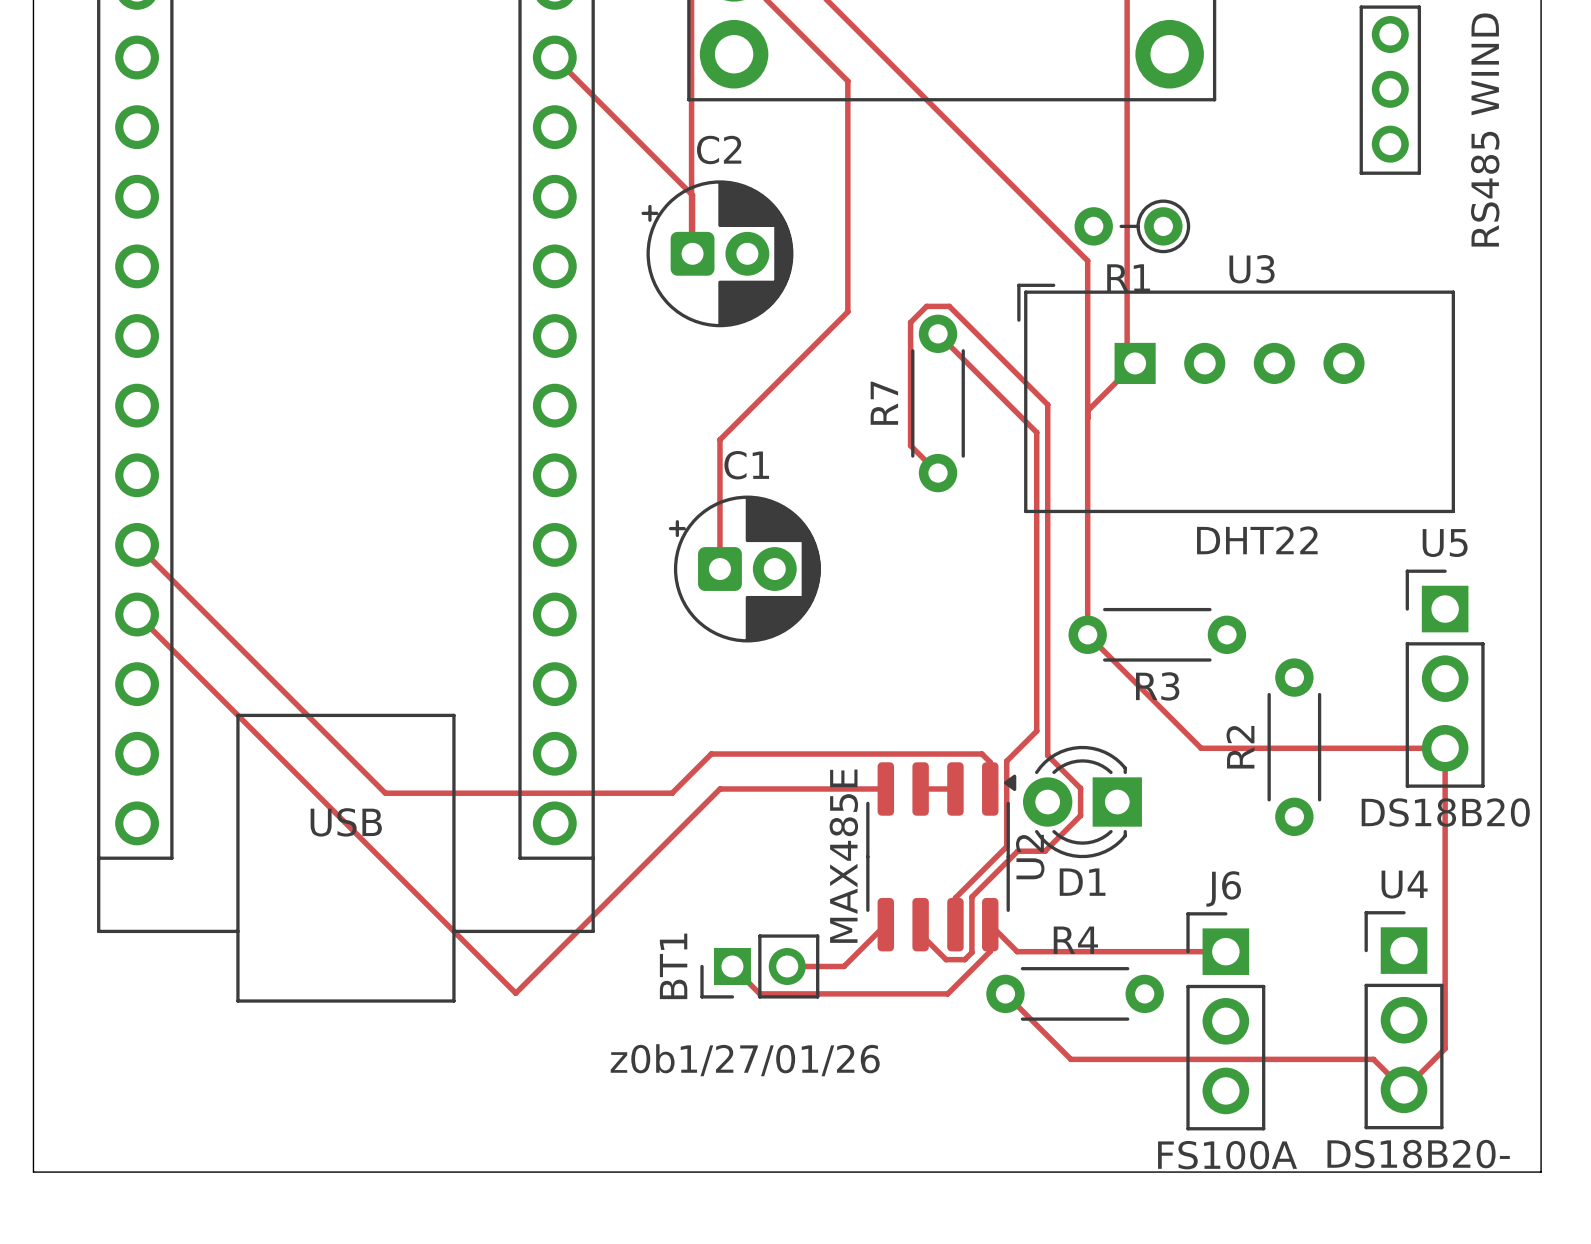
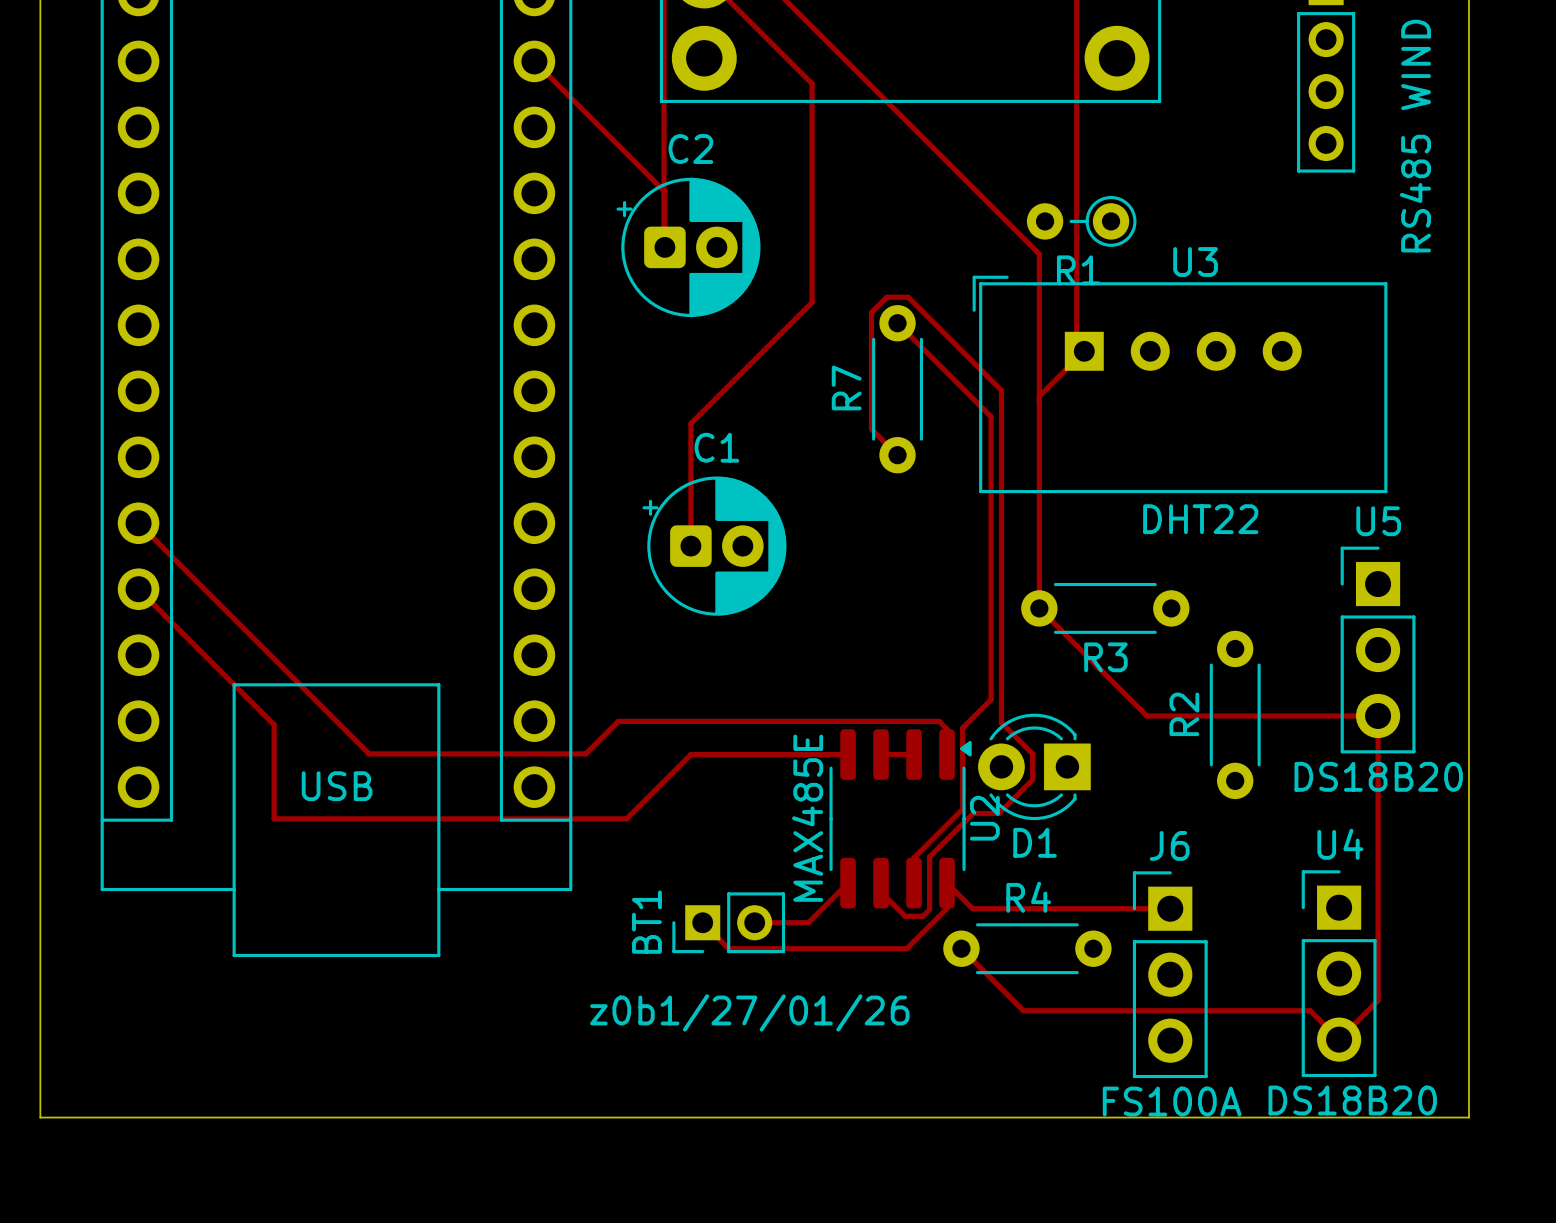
track: (711, 754) (672, 793) (385, 793) (380, 788) -> (682, 721) (618, 721) (585, 753) (369, 753)
track: (280, 757) (515, 993) (652, 856) -> (274, 724) (274, 818) (626, 818)
U4 value: DS18B20- (1418, 1154) -> DS18B20 (1352, 1100)

